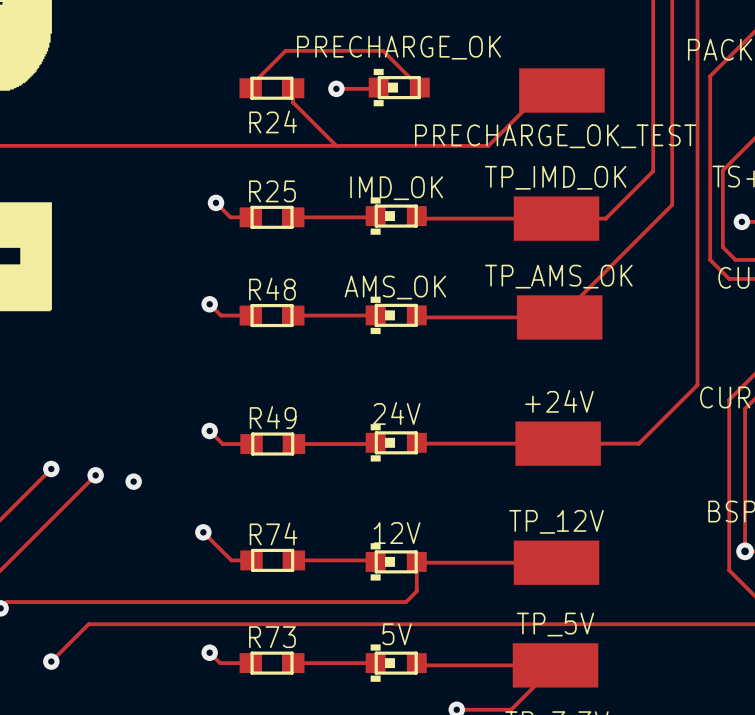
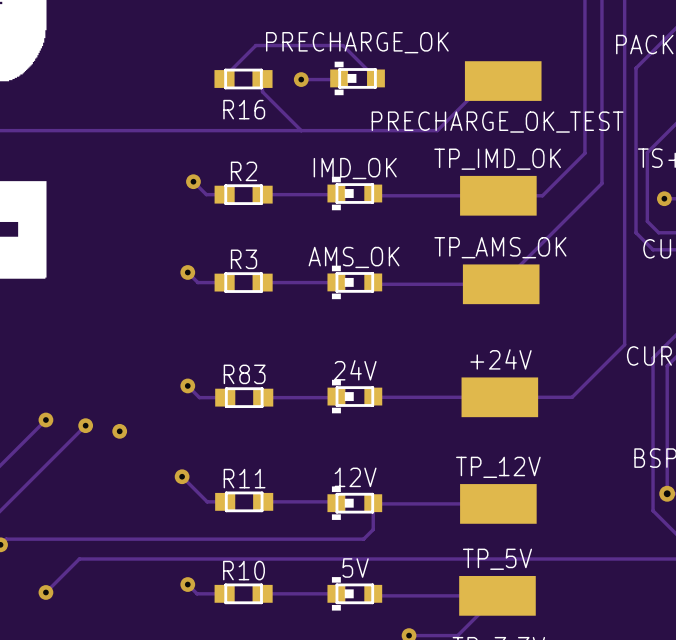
R24 name: R24 (273, 121) -> R16 (244, 109)
R25 name: R25 (272, 191) -> R2 (244, 171)
R48 name: R48 (272, 289) -> R3 (244, 259)
R49 name: R49 (273, 417) -> R83 (244, 374)
R74 name: R74 (273, 533) -> R11 (244, 478)
R73 name: R73 (272, 637) -> R10 (244, 570)

